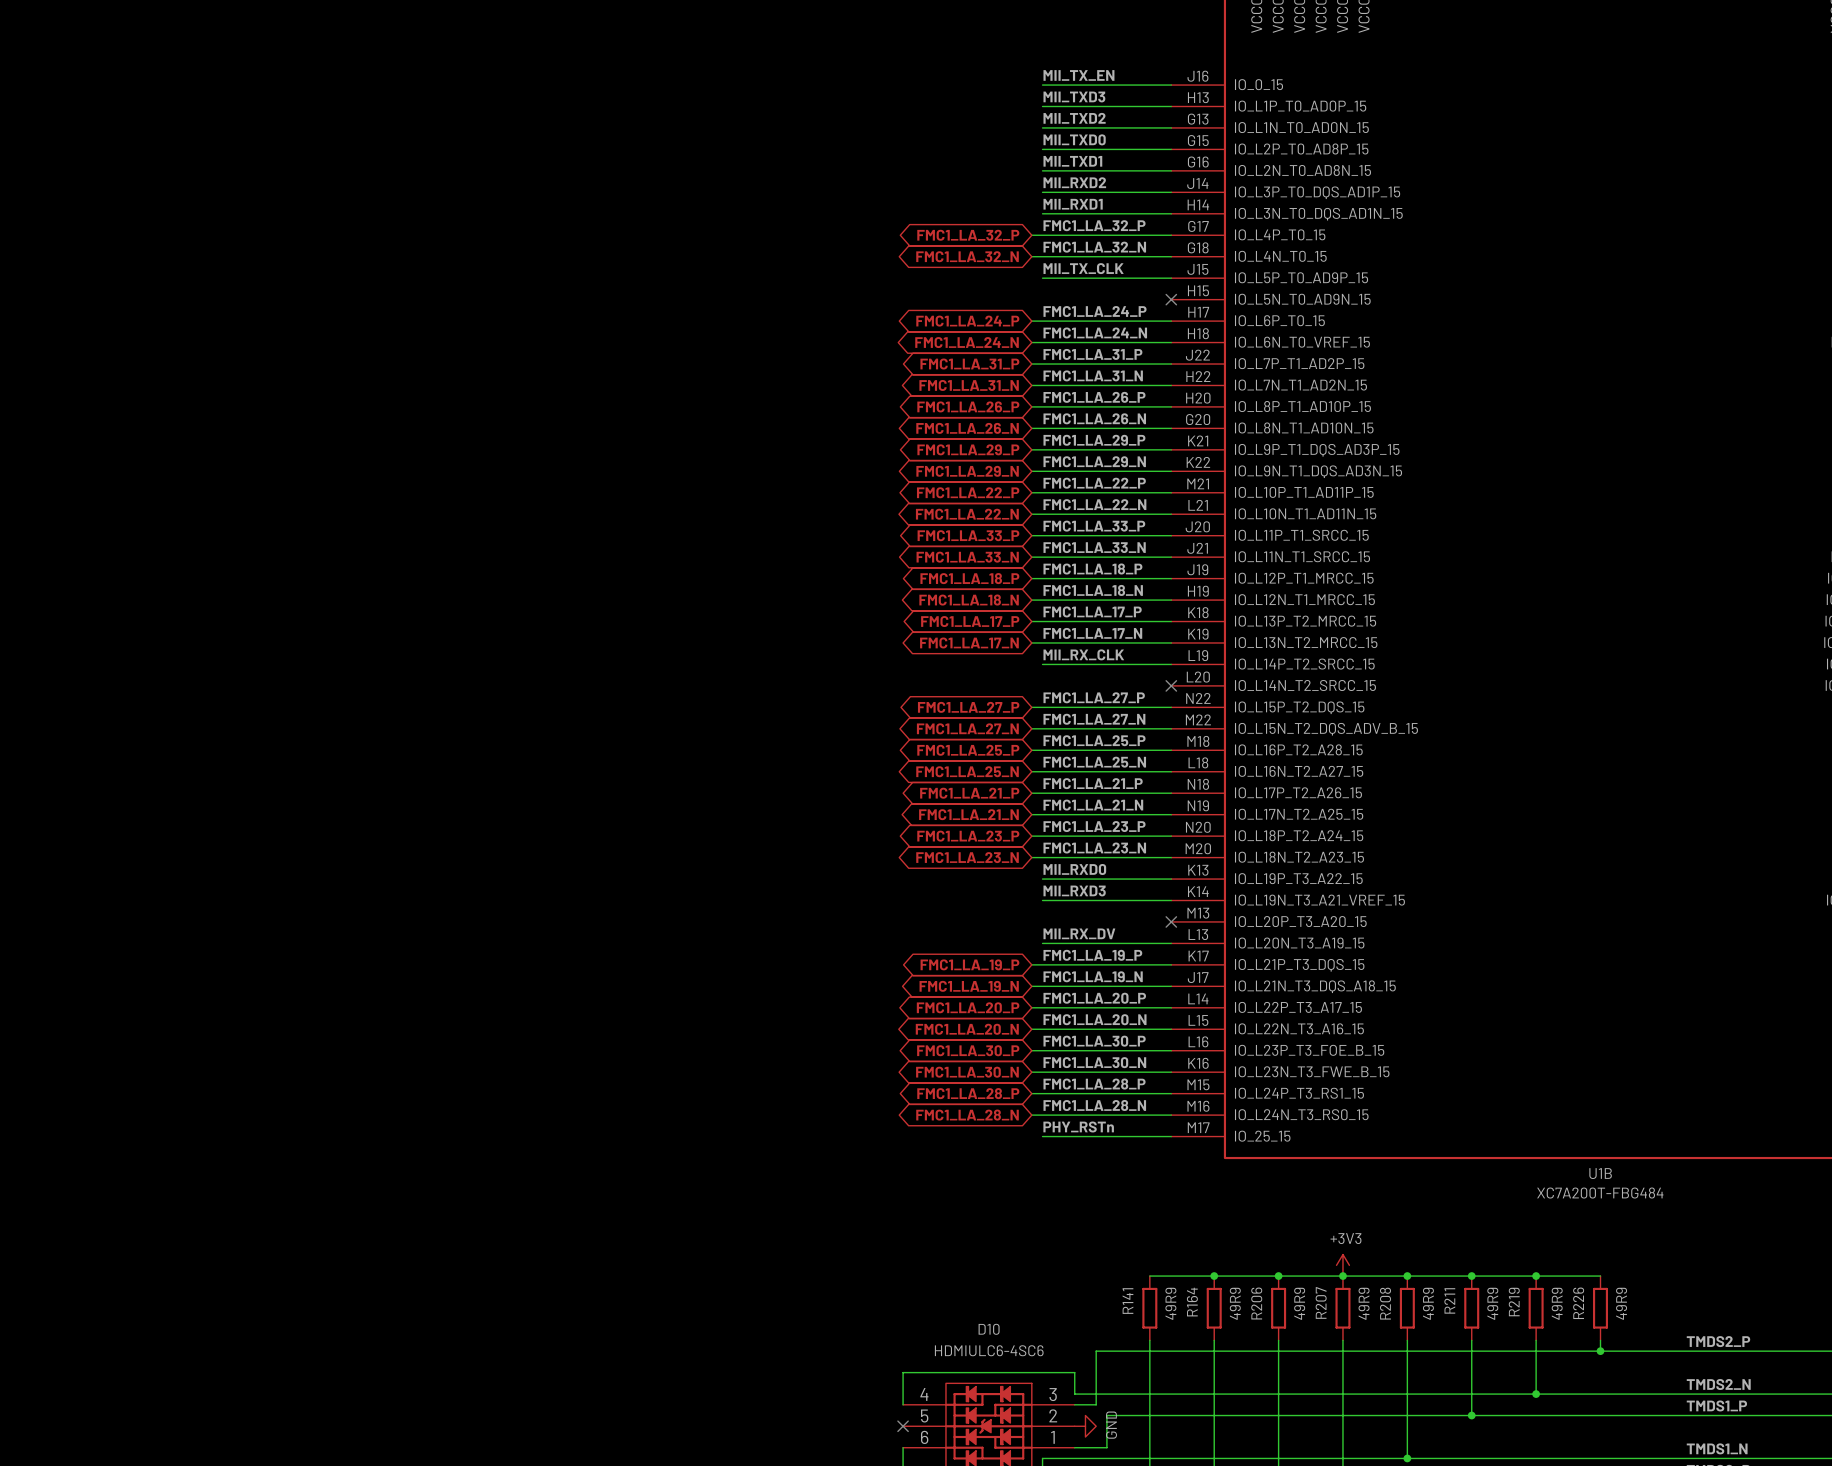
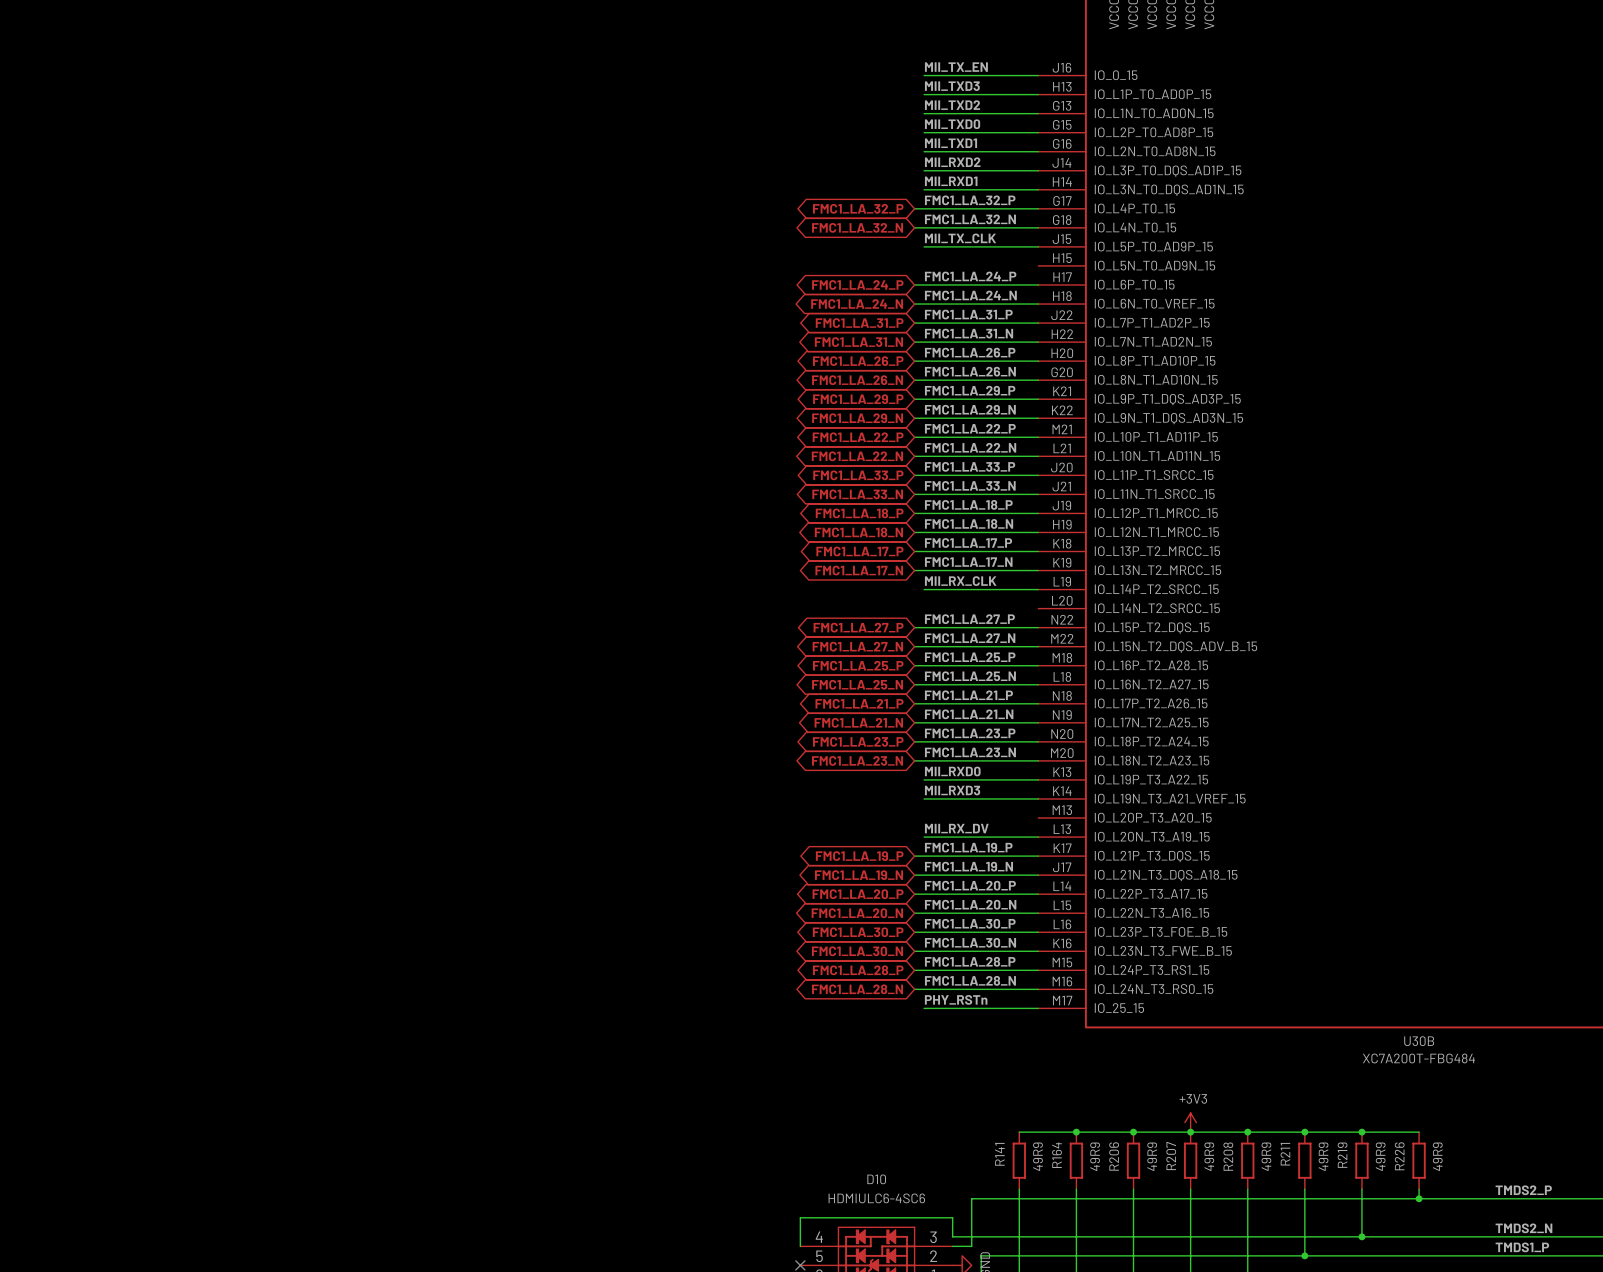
no-connect mark: (1171, 299) -> none
no-connect mark: (1171, 685) -> none
no-connect mark: (1171, 921) -> none
U1B name: U1B (1600, 1173) -> U30B (1419, 1041)

